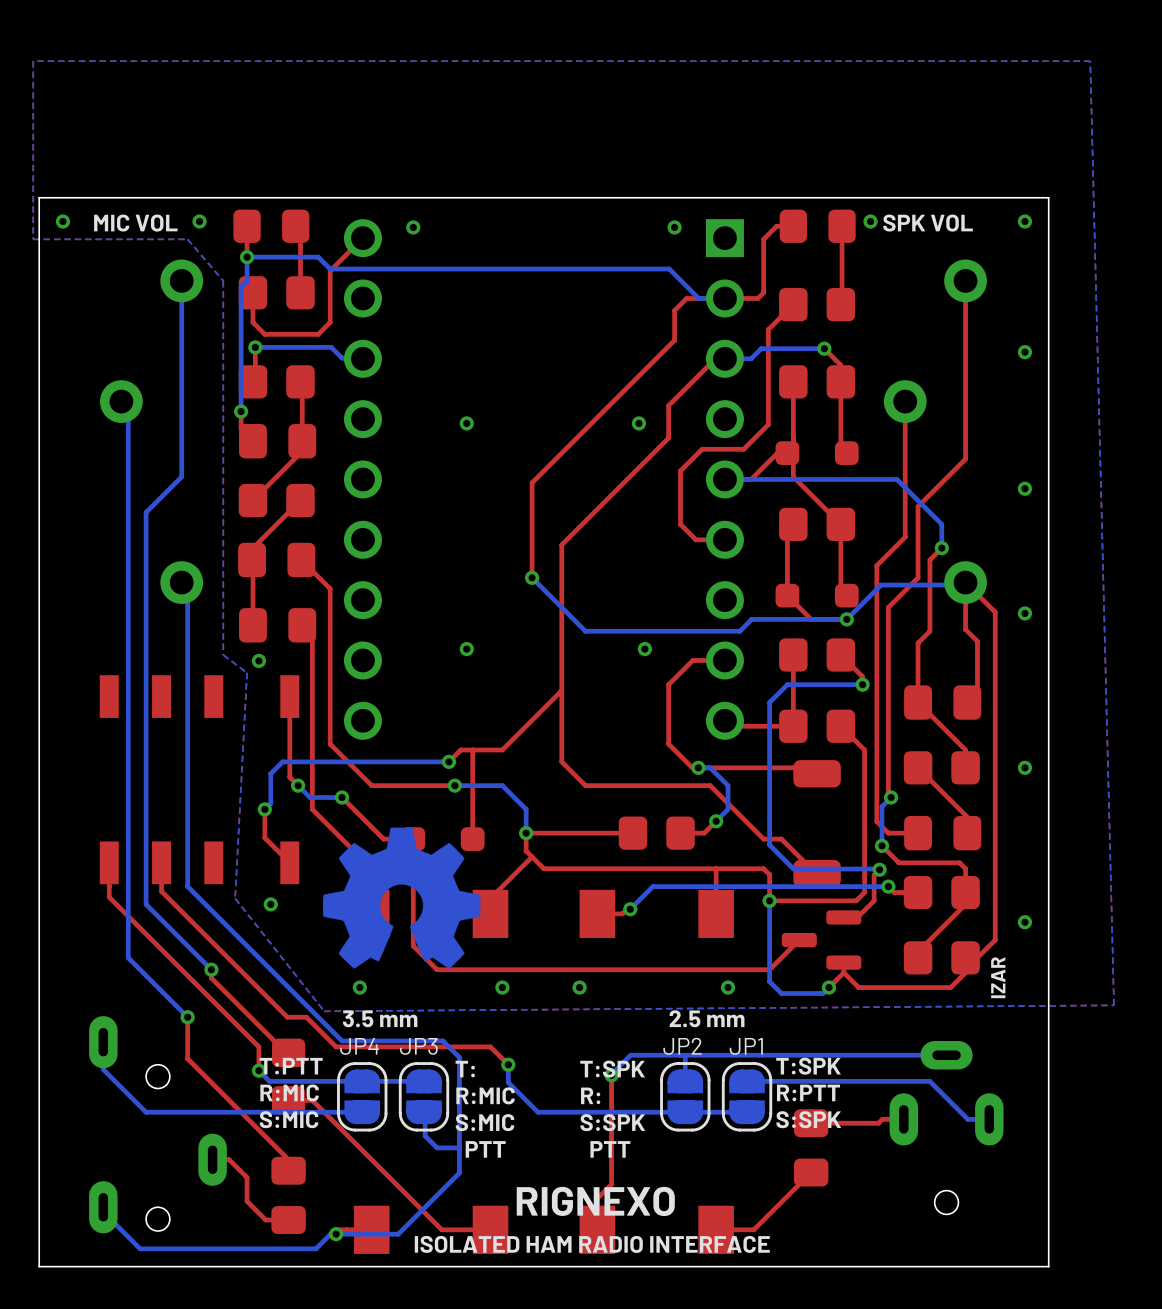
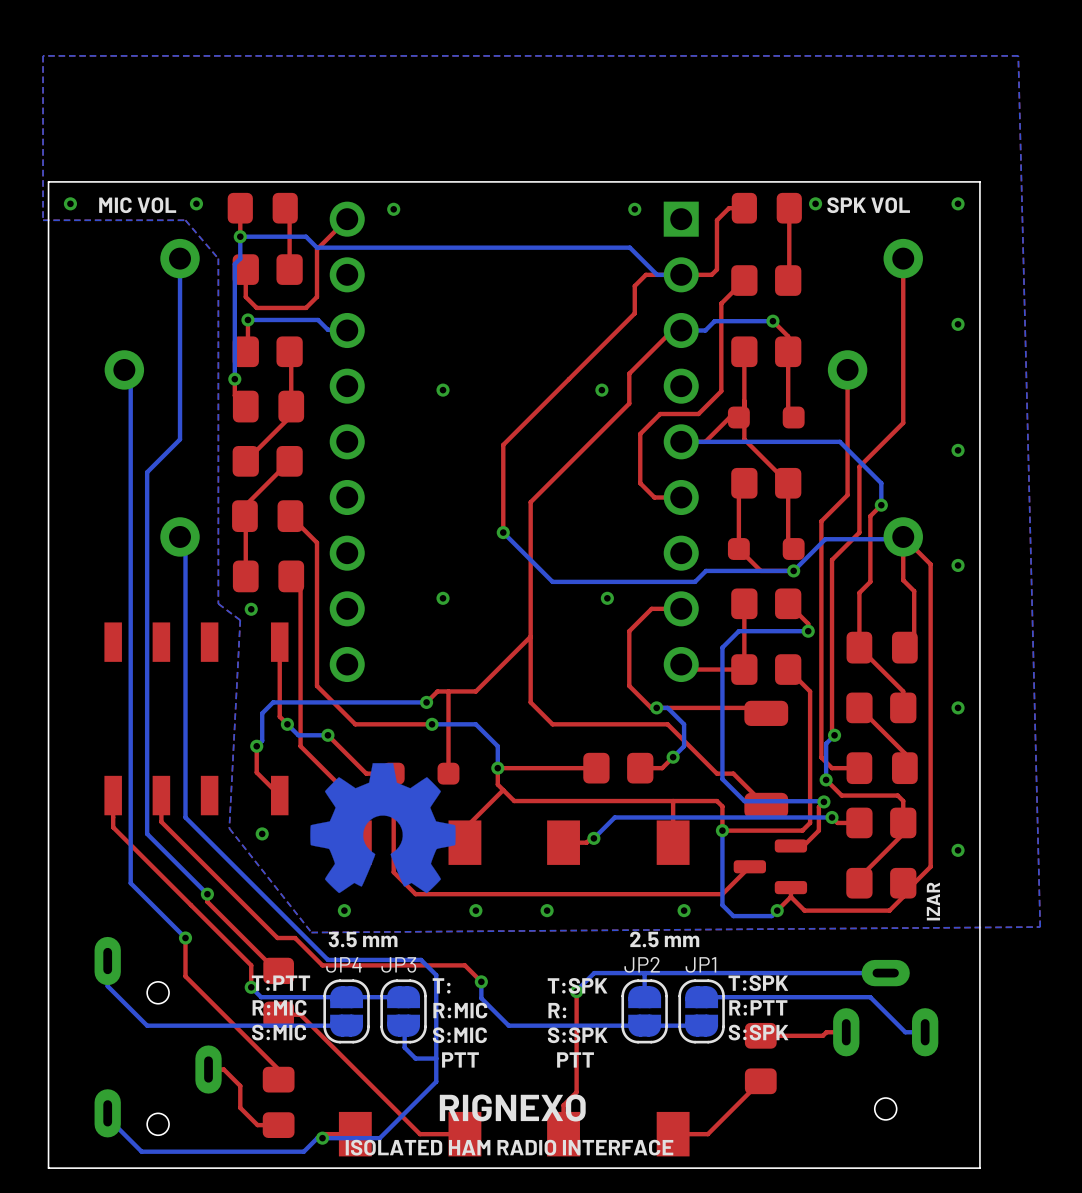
text position: RIGNEXO (595, 1201) -> RIGNEXO (512, 1107)
text position: ISOLATED HAM RADIO INTERFACE (592, 1244) -> ISOLATED HAM RADIO INTERFACE (509, 1147)

